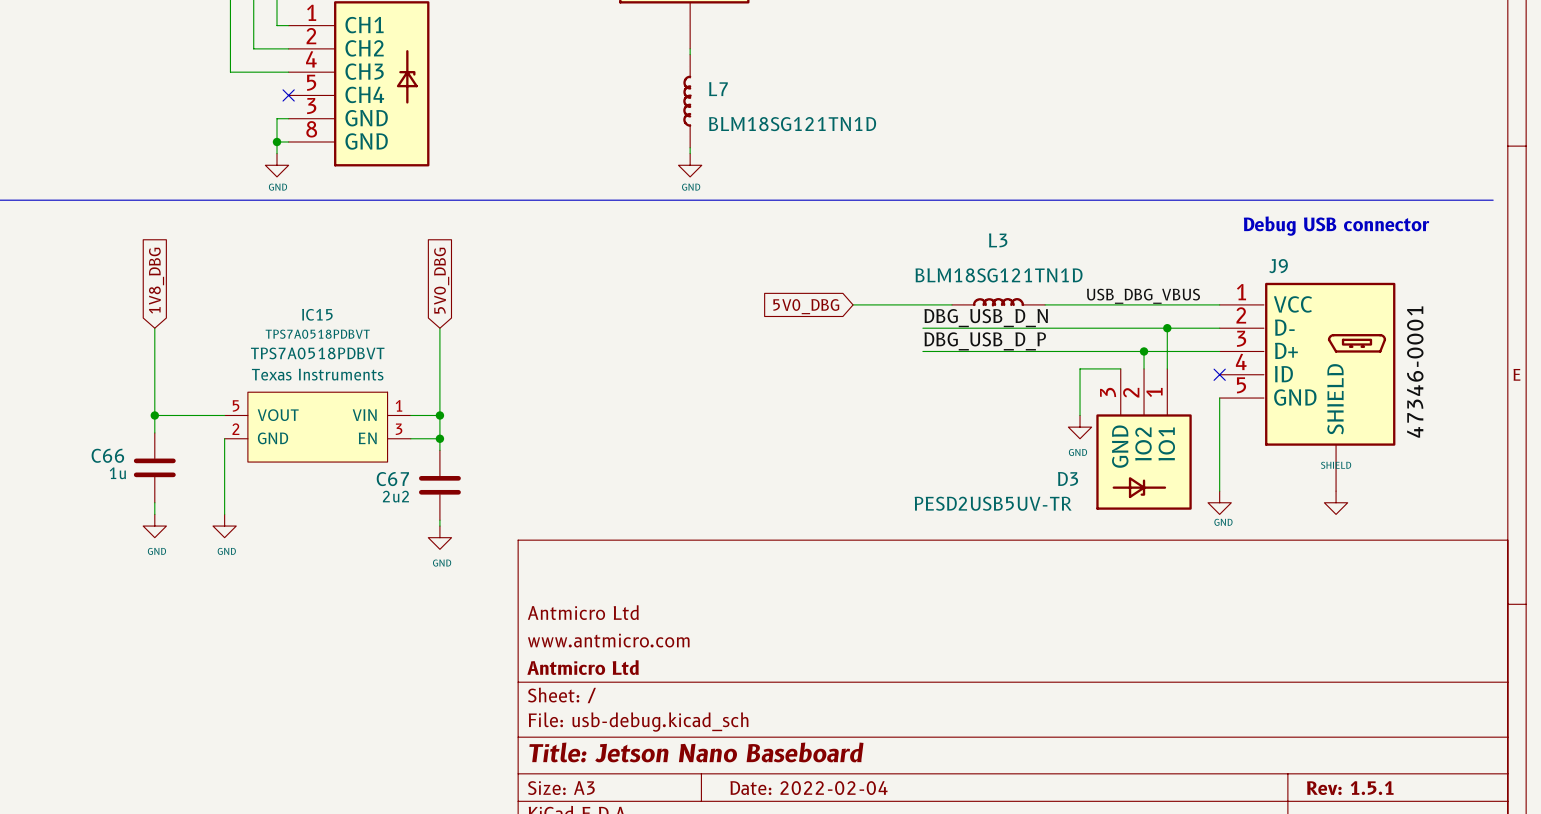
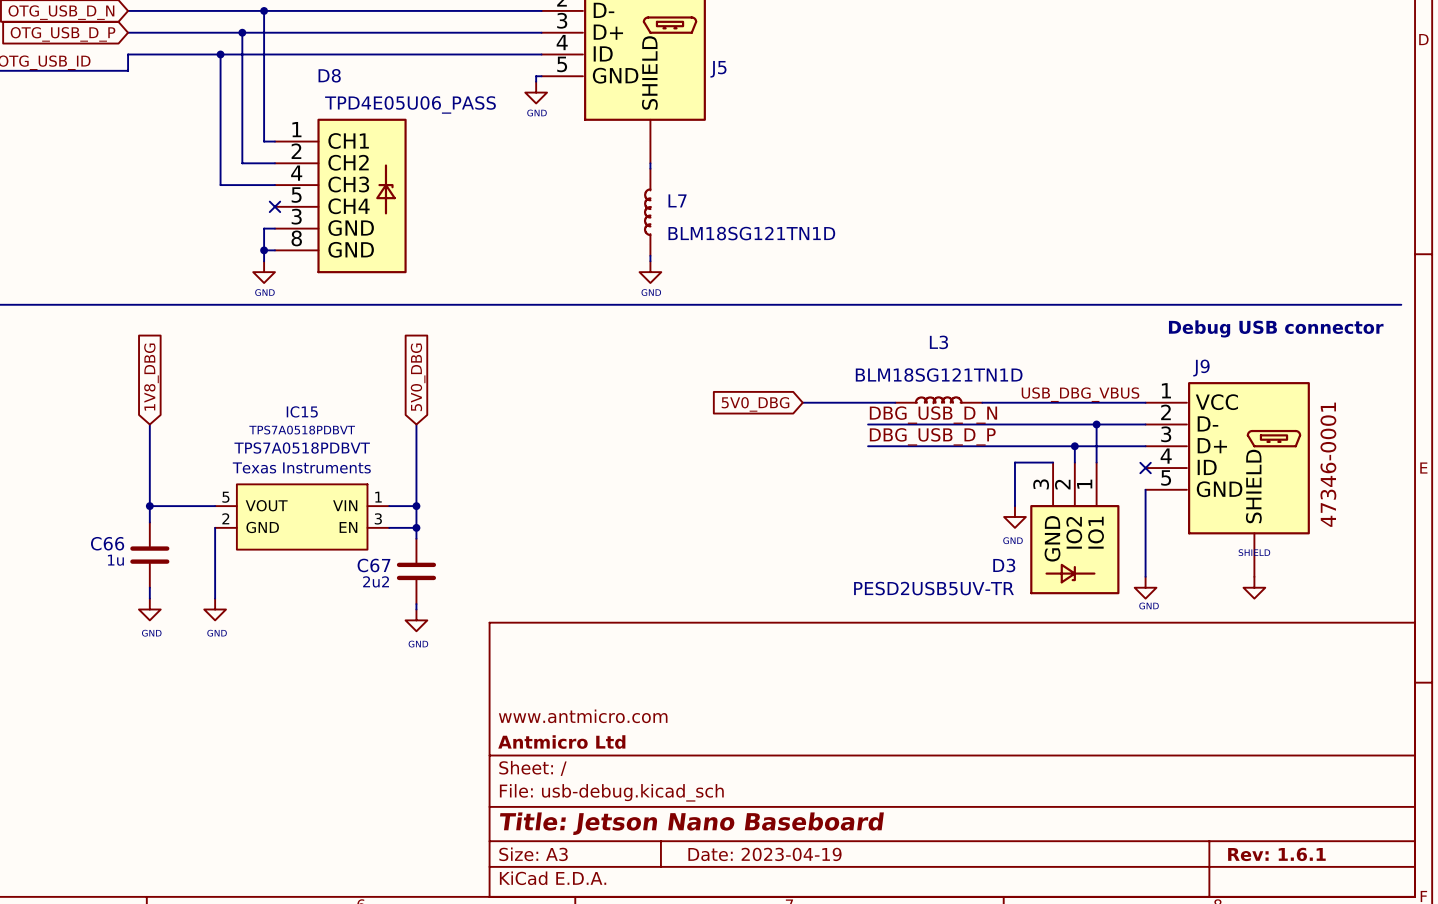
title block: Antmicro Ltd (583, 612) -> none
title block: Date: 2022-02-04 (809, 788) -> Date: 2023-04-19 (764, 854)
title block: Rev: 1.5.1 (1350, 788) -> Rev: 1.6.1 (1276, 854)

